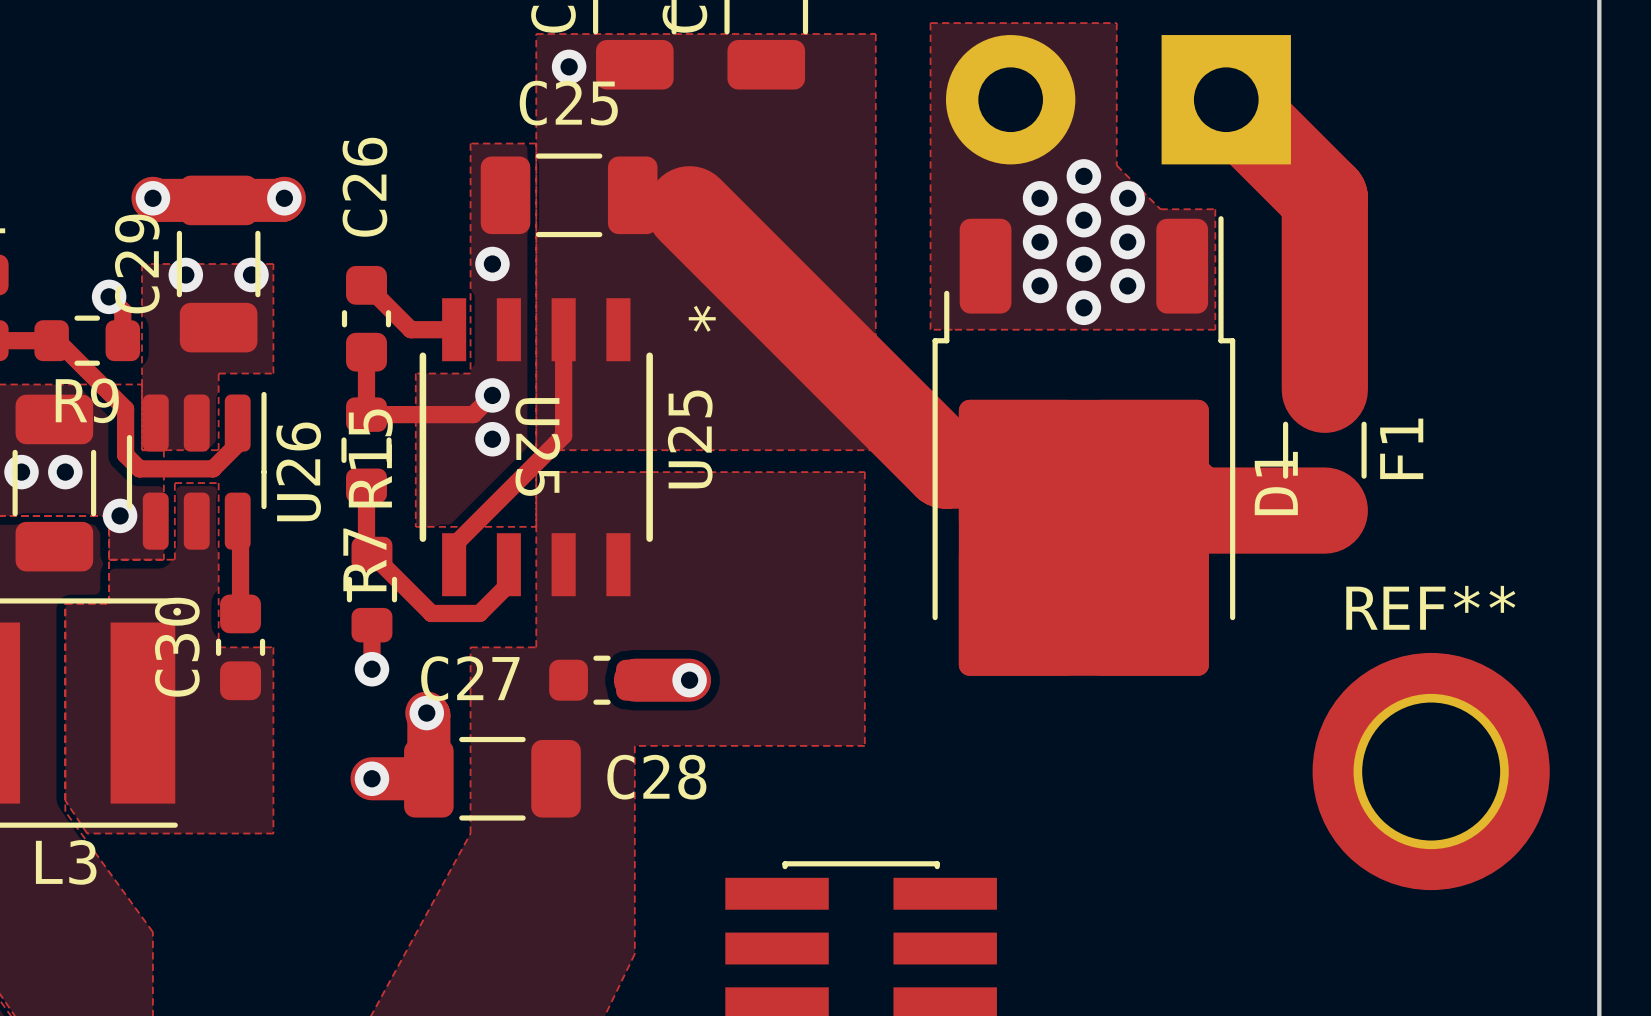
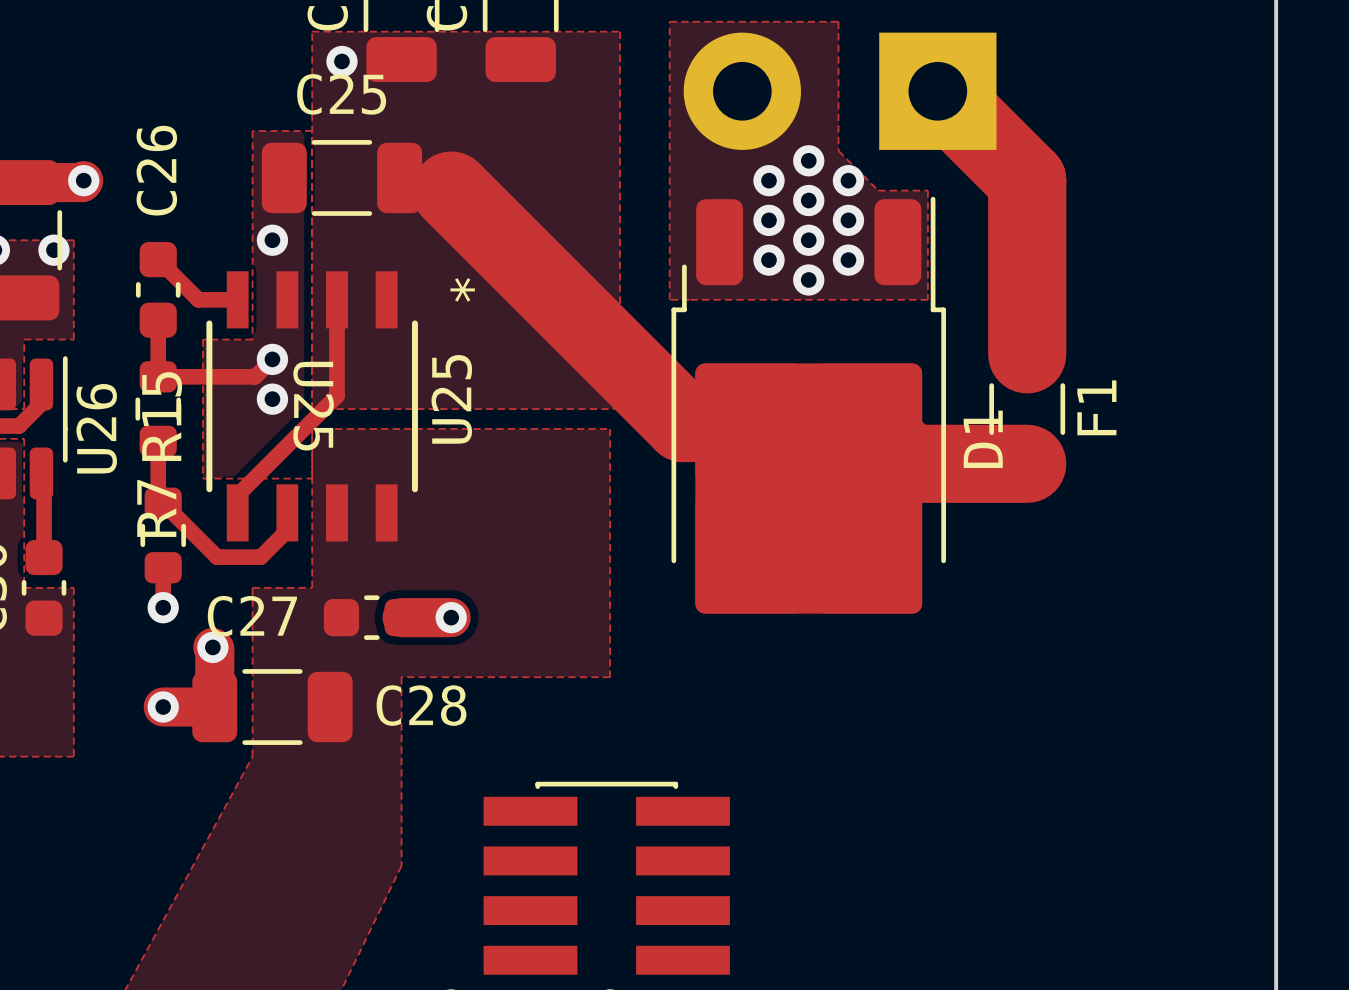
REF**: (1431, 771) -> none

